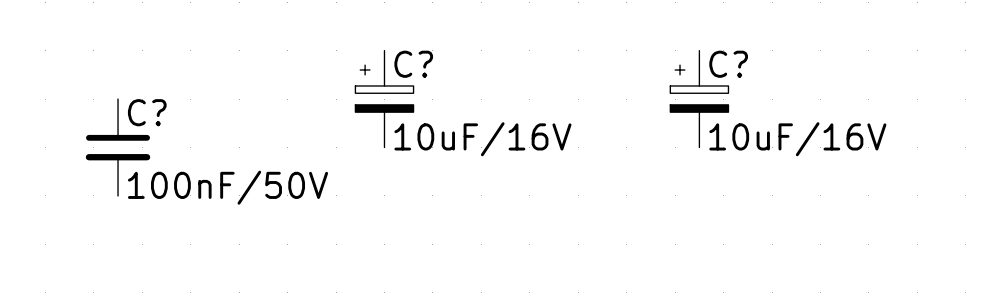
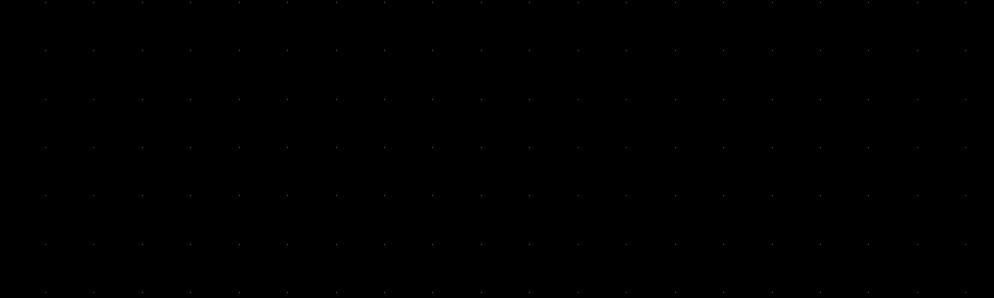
C?: 10uF/16V (384, 99) -> none
C?: 10uF/16V (699, 99) -> none
C?: 100nF/50V (118, 147) -> none

